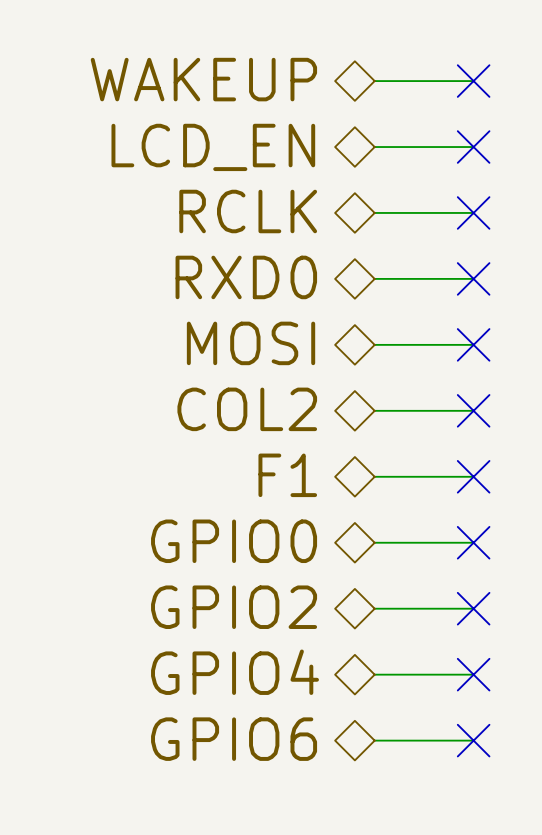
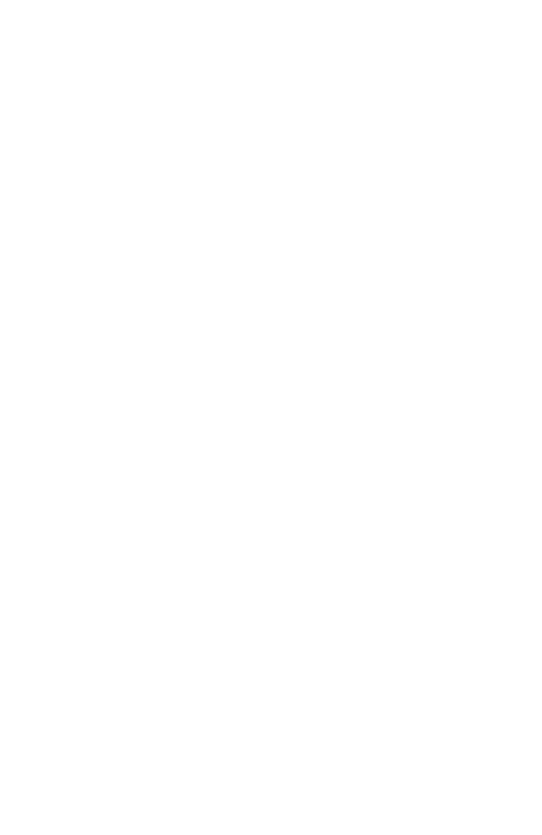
hierarchical label: WAKEUP (203, 79) -> none
wire: (374, 81) (473, 81) -> none
no-connect mark: (473, 81) -> none
hierarchical label: LCD_EN (213, 147) -> none
wire: (374, 147) (473, 147) -> none
no-connect mark: (473, 147) -> none
hierarchical label: RCLK (248, 211) -> none
wire: (374, 212) (473, 212) -> none
no-connect mark: (473, 212) -> none
hierarchical label: RXD0 (246, 277) -> none
wire: (374, 278) (473, 278) -> none
no-connect mark: (473, 278) -> none
hierarchical label: MOSI (251, 343) -> none
wire: (374, 344) (473, 344) -> none
no-connect mark: (473, 344) -> none
hierarchical label: COL2 (247, 409) -> none
wire: (374, 410) (473, 410) -> none
no-connect mark: (473, 410) -> none
hierarchical label: F1 (287, 475) -> none
wire: (374, 476) (473, 476) -> none
no-connect mark: (473, 476) -> none
hierarchical label: GPIO0 (234, 541) -> none
wire: (374, 542) (473, 542) -> none
no-connect mark: (473, 542) -> none
hierarchical label: GPIO2 (234, 607) -> none
wire: (374, 608) (473, 608) -> none
no-connect mark: (473, 608) -> none
hierarchical label: GPIO4 (235, 672) -> none
wire: (374, 674) (473, 674) -> none
no-connect mark: (473, 674) -> none
hierarchical label: GPIO6 (234, 739) -> none
wire: (374, 740) (473, 740) -> none
no-connect mark: (473, 740) -> none

